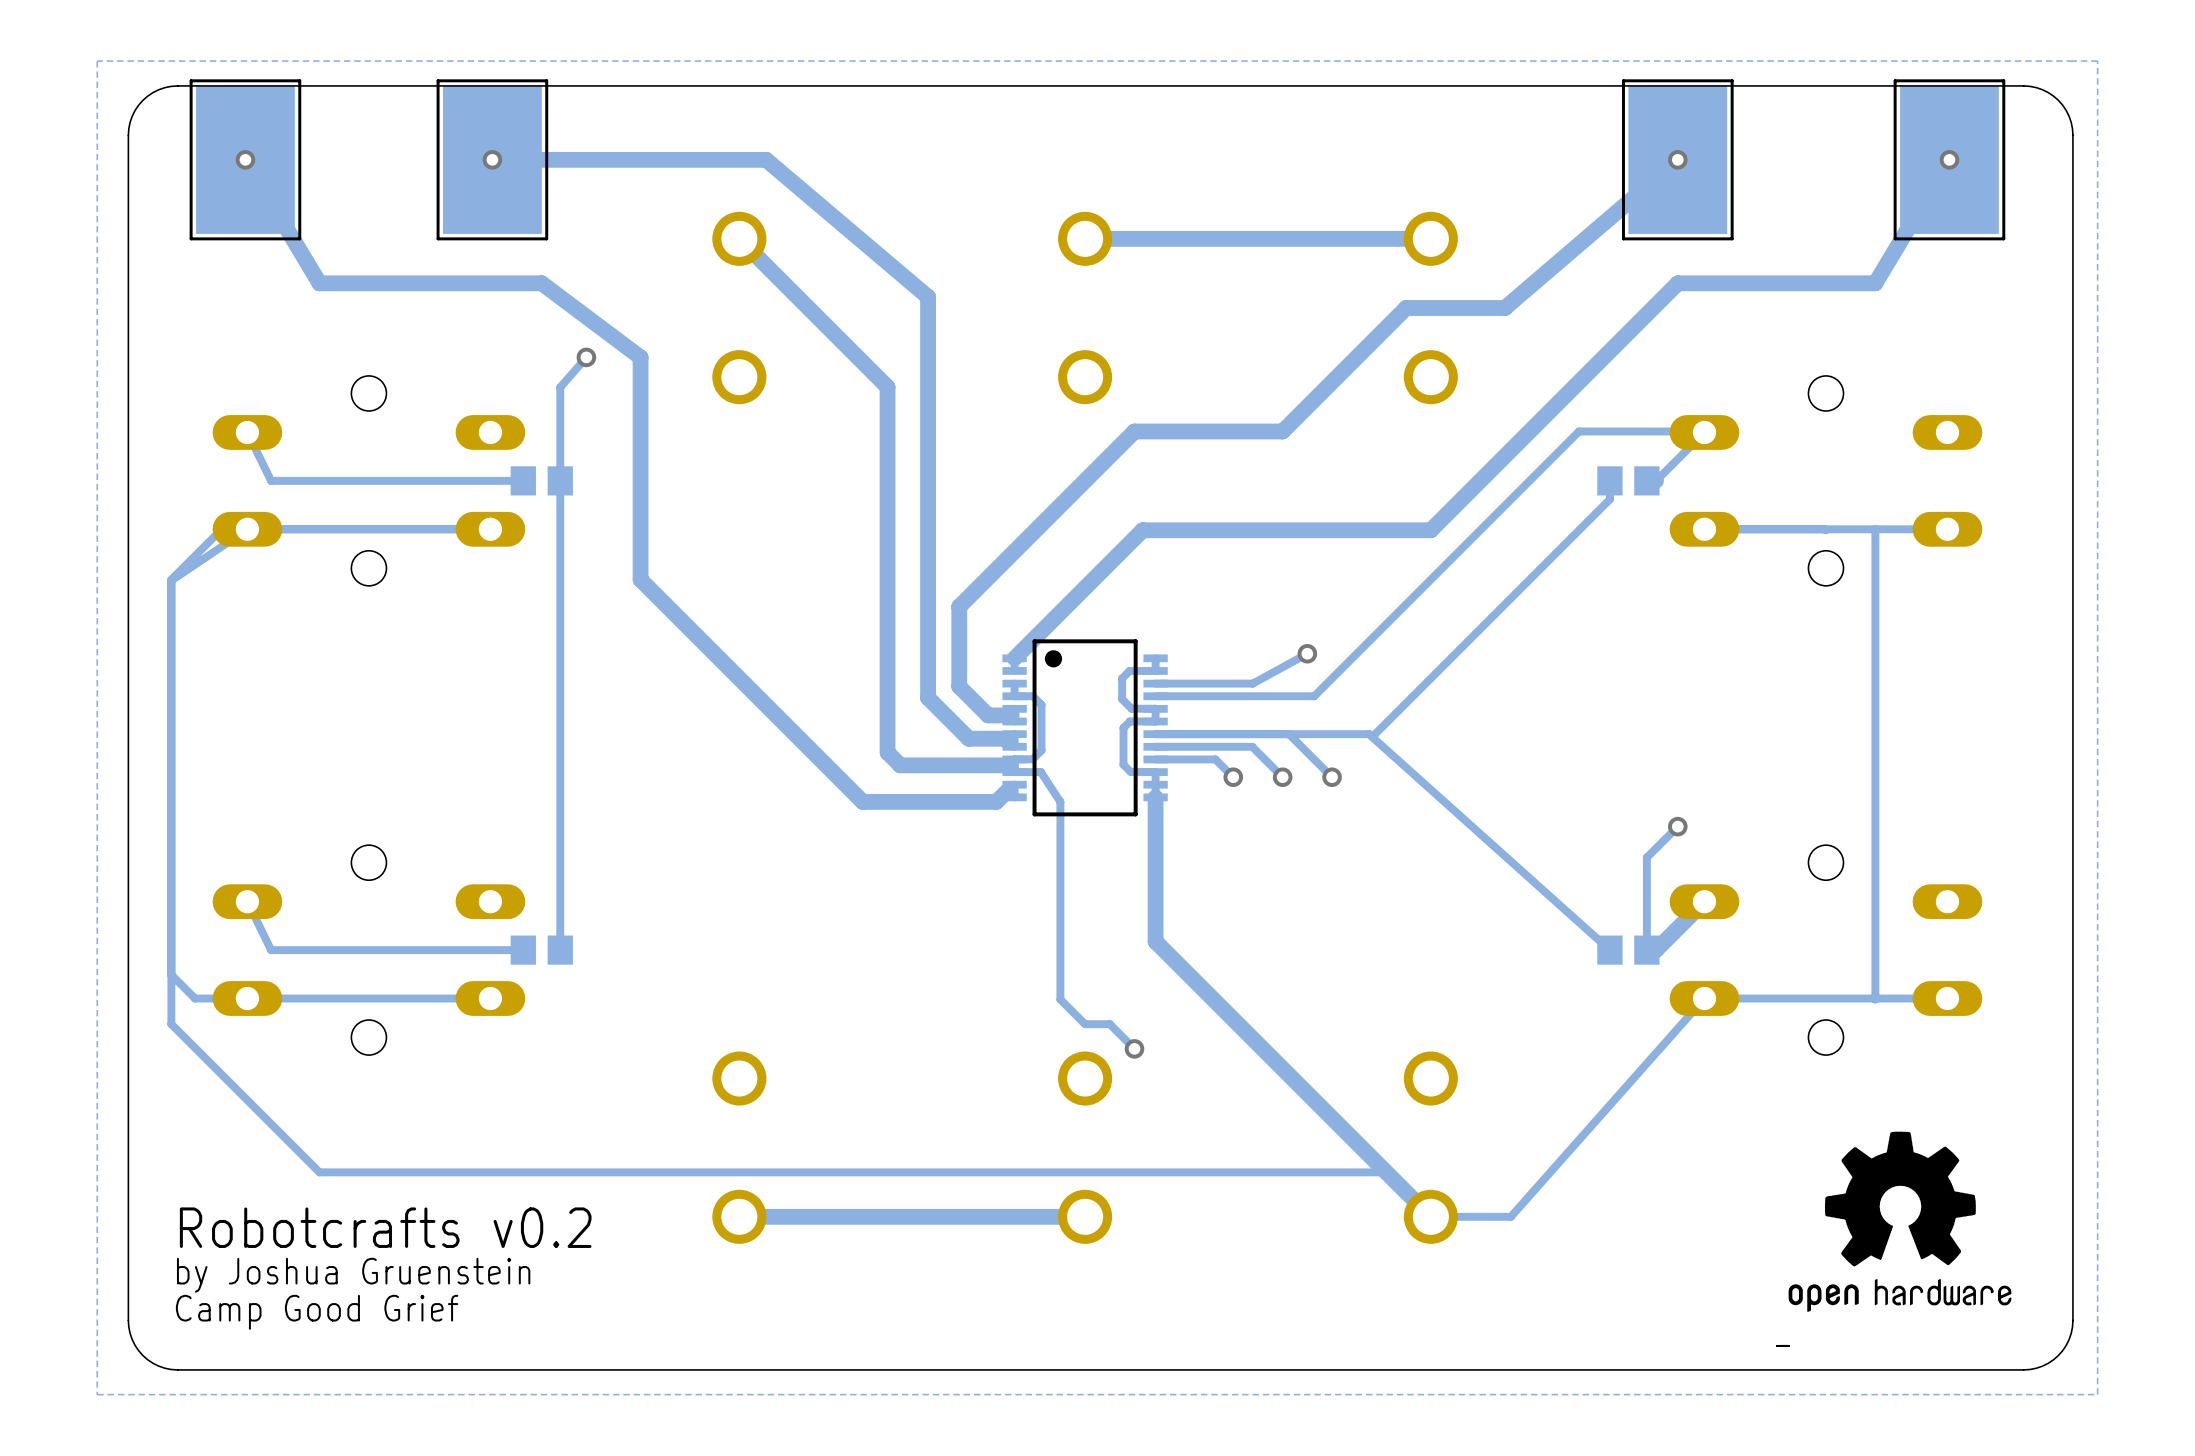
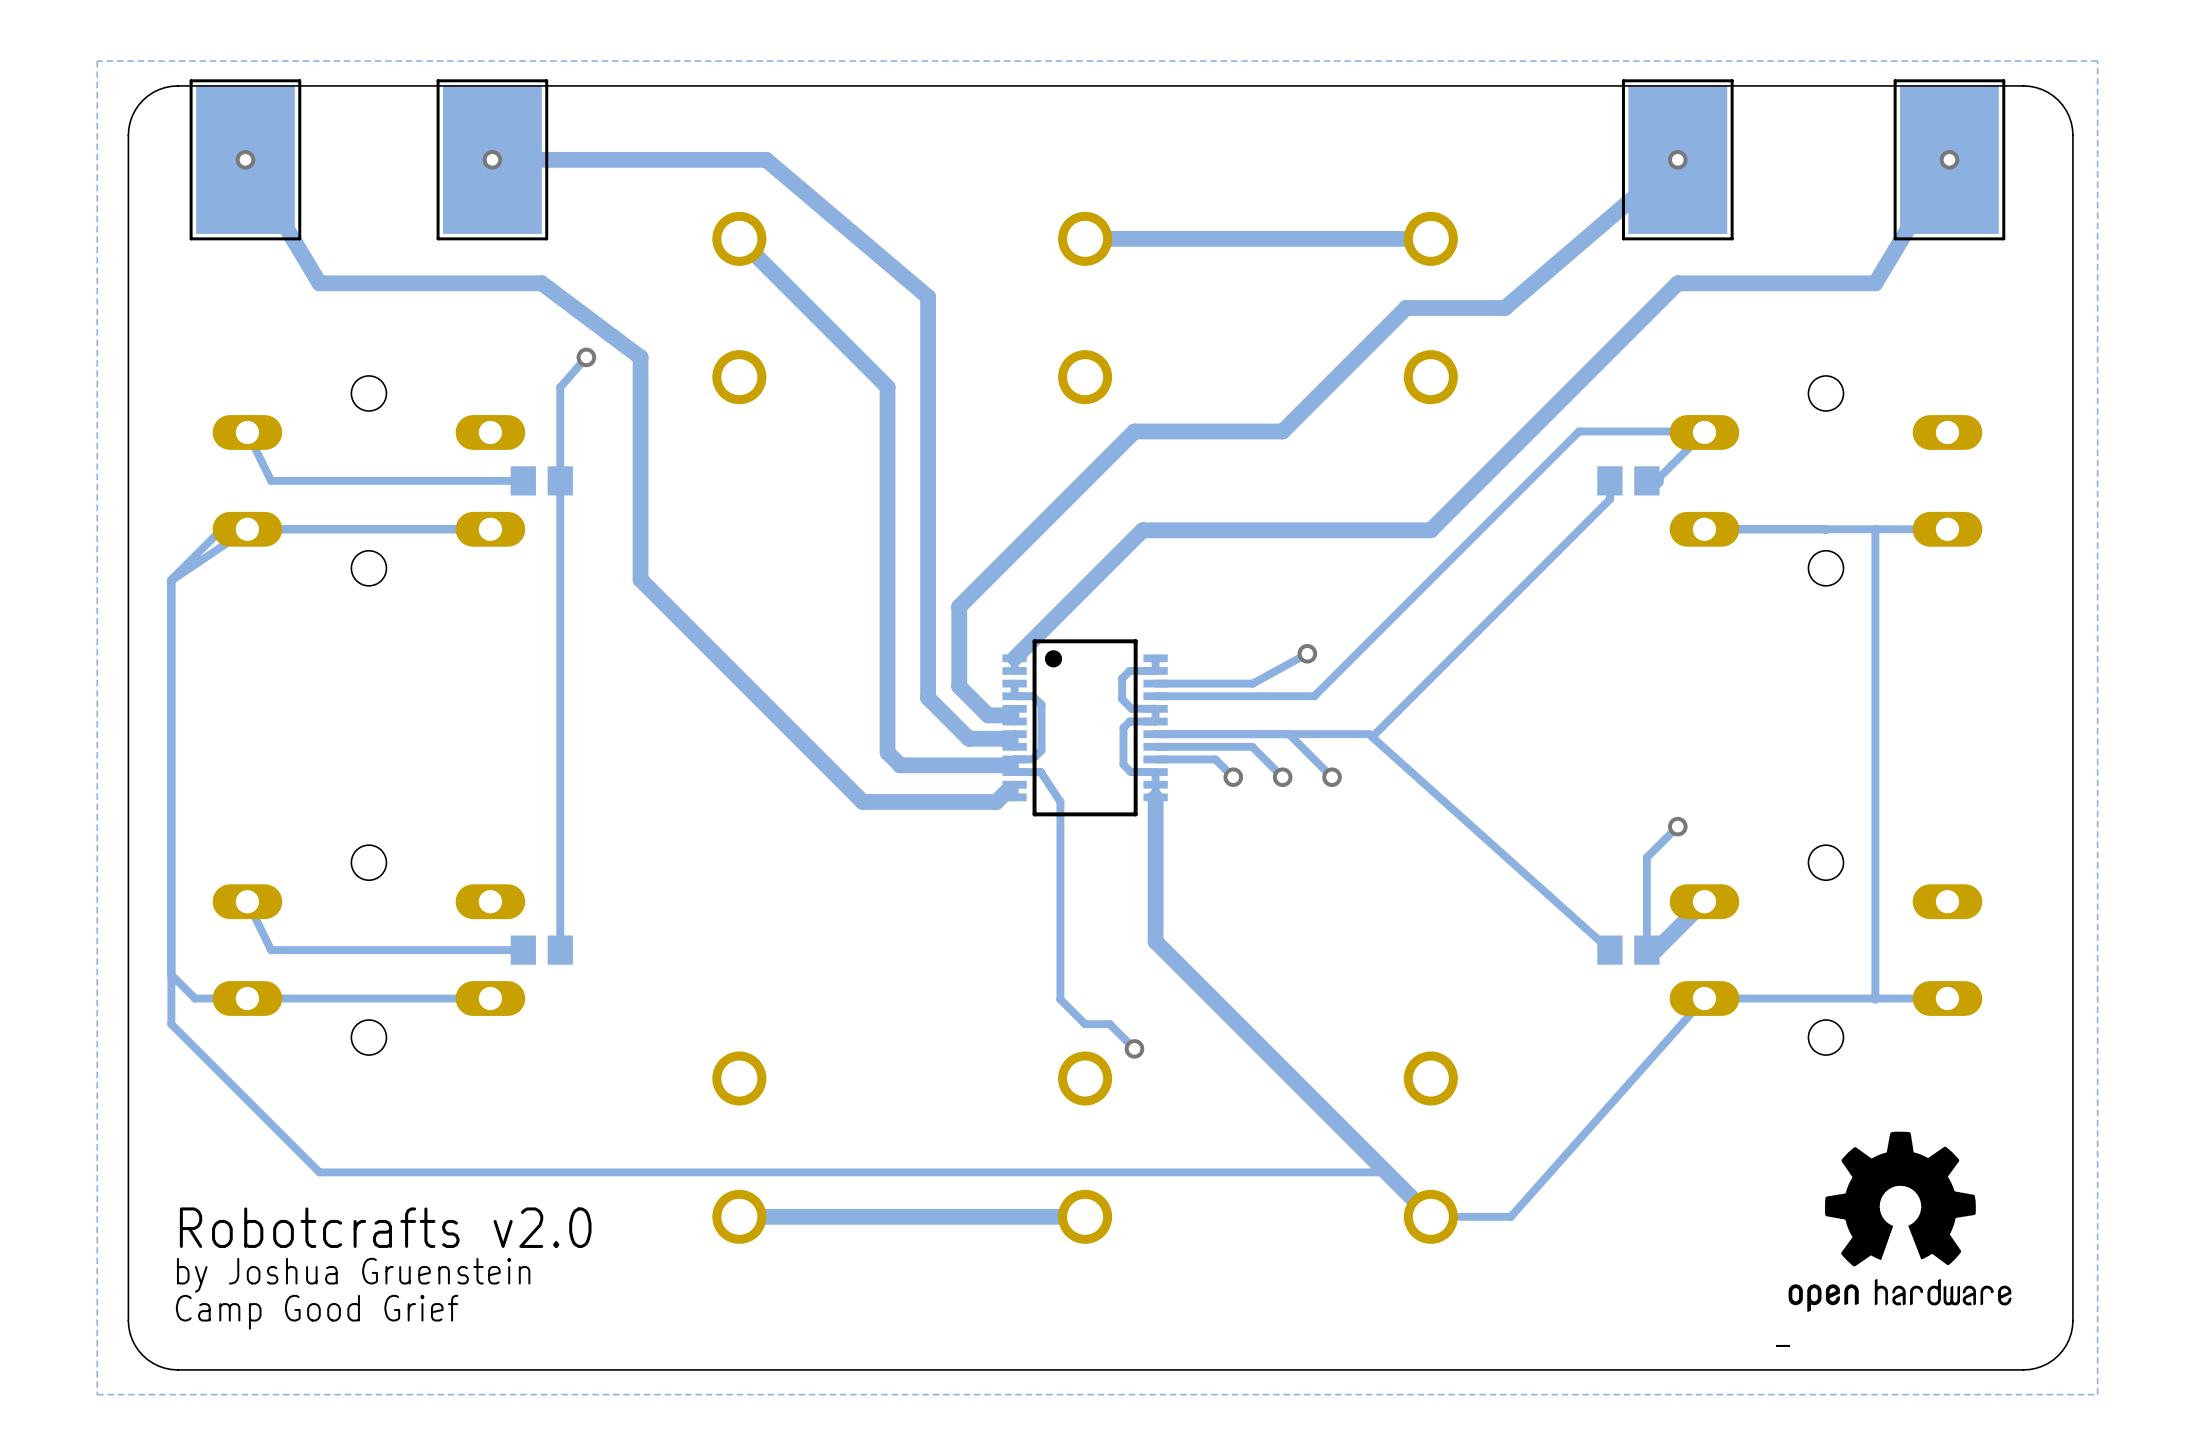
text: Robotcrafts v0.2 (385, 1227) -> Robotcrafts v2.0 (385, 1227)

